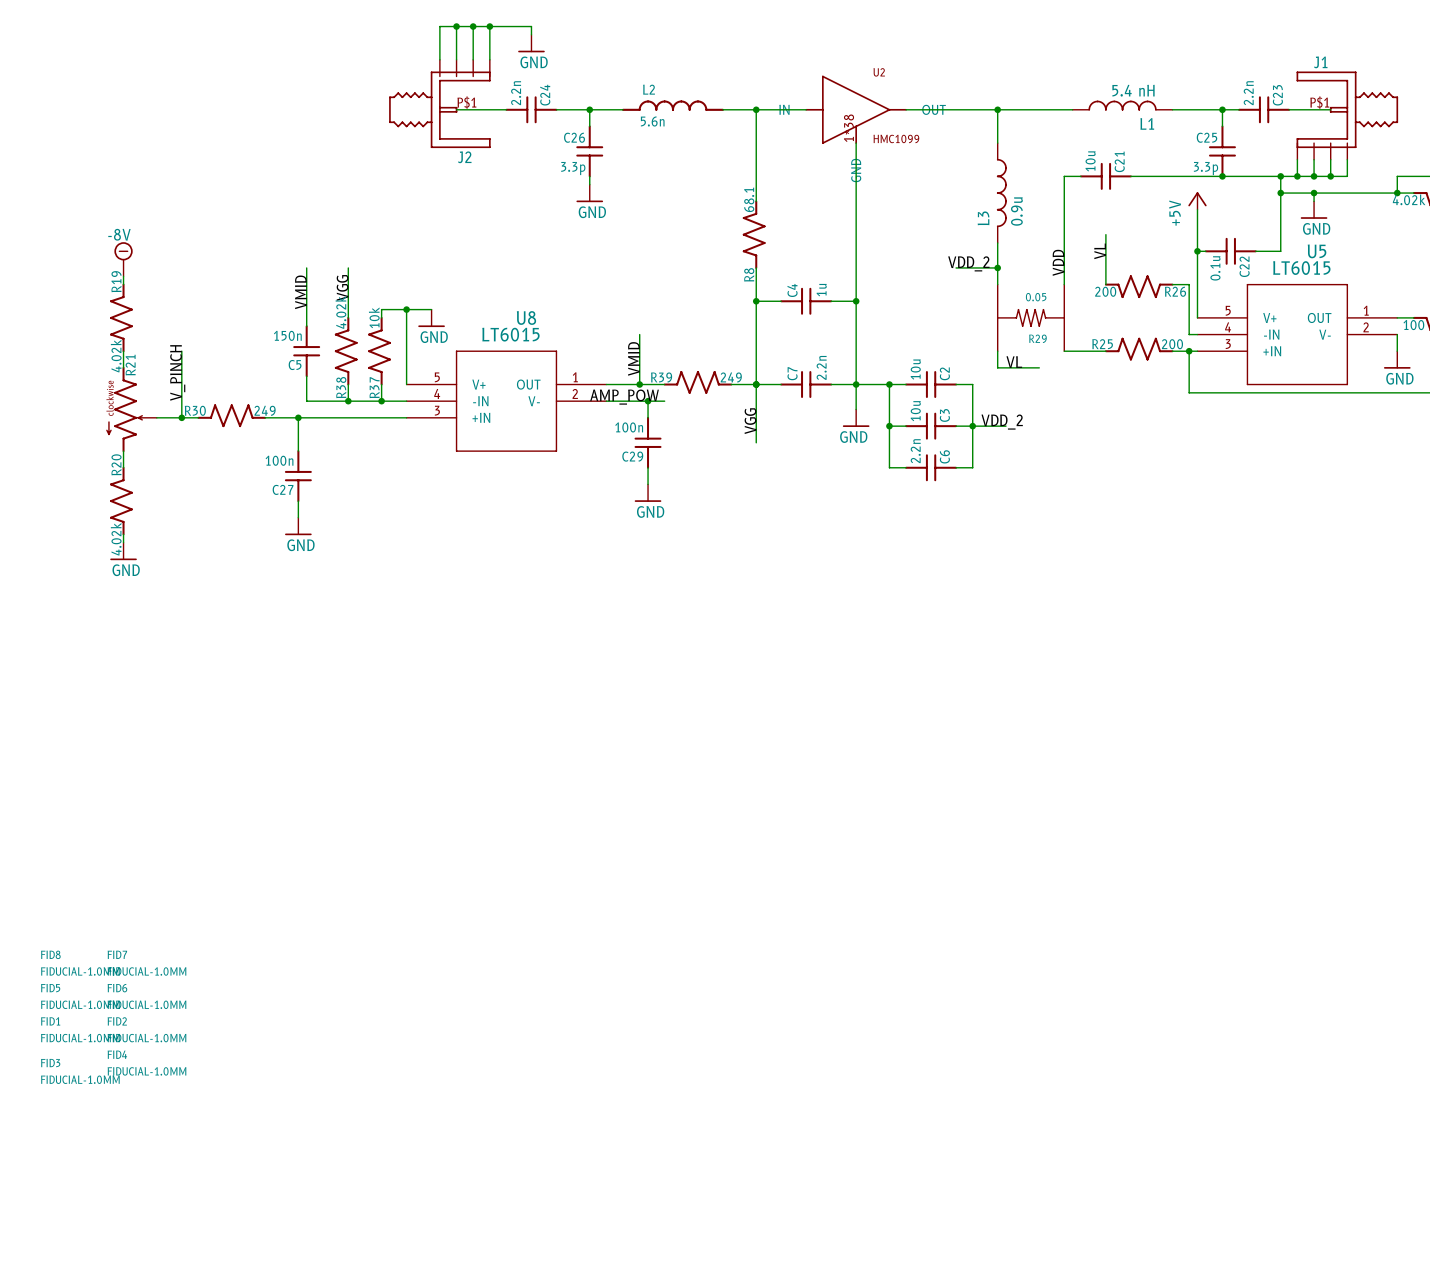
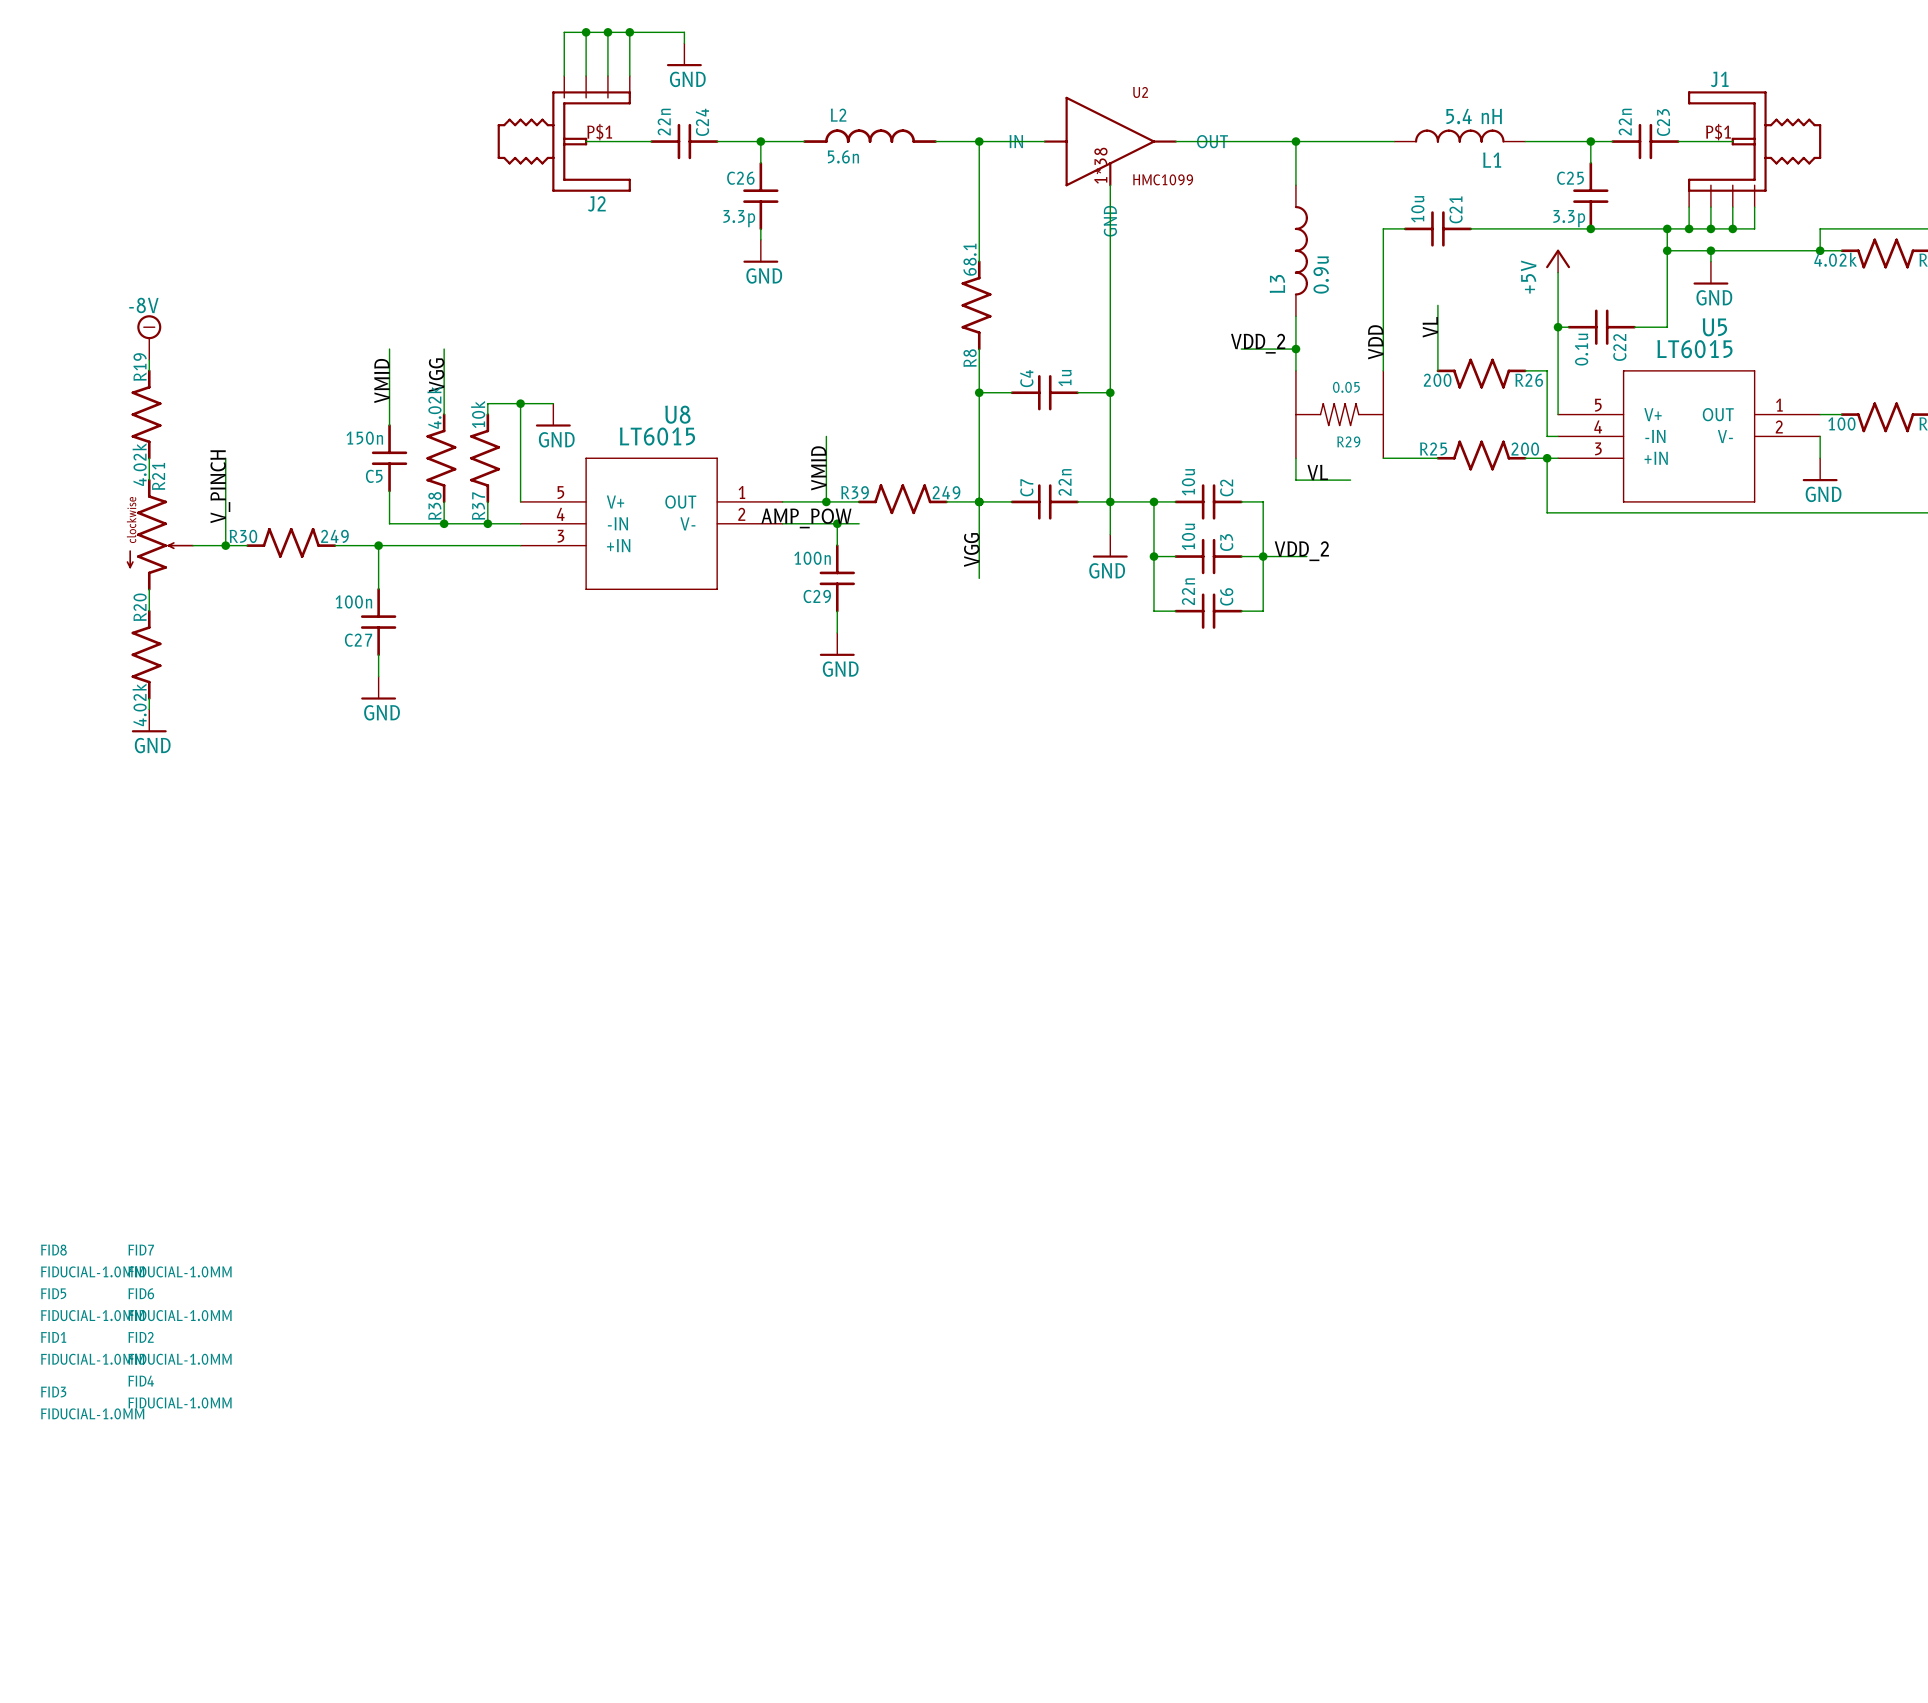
C24 value: 2.2n (516, 93) -> 22n (664, 122)
C23 value: 2.2n (1248, 93) -> 22n (1625, 122)
C7 value: 2.2n (821, 367) -> 22n (1065, 482)
C6 value: 2.2n (915, 451) -> 22n (1188, 591)

